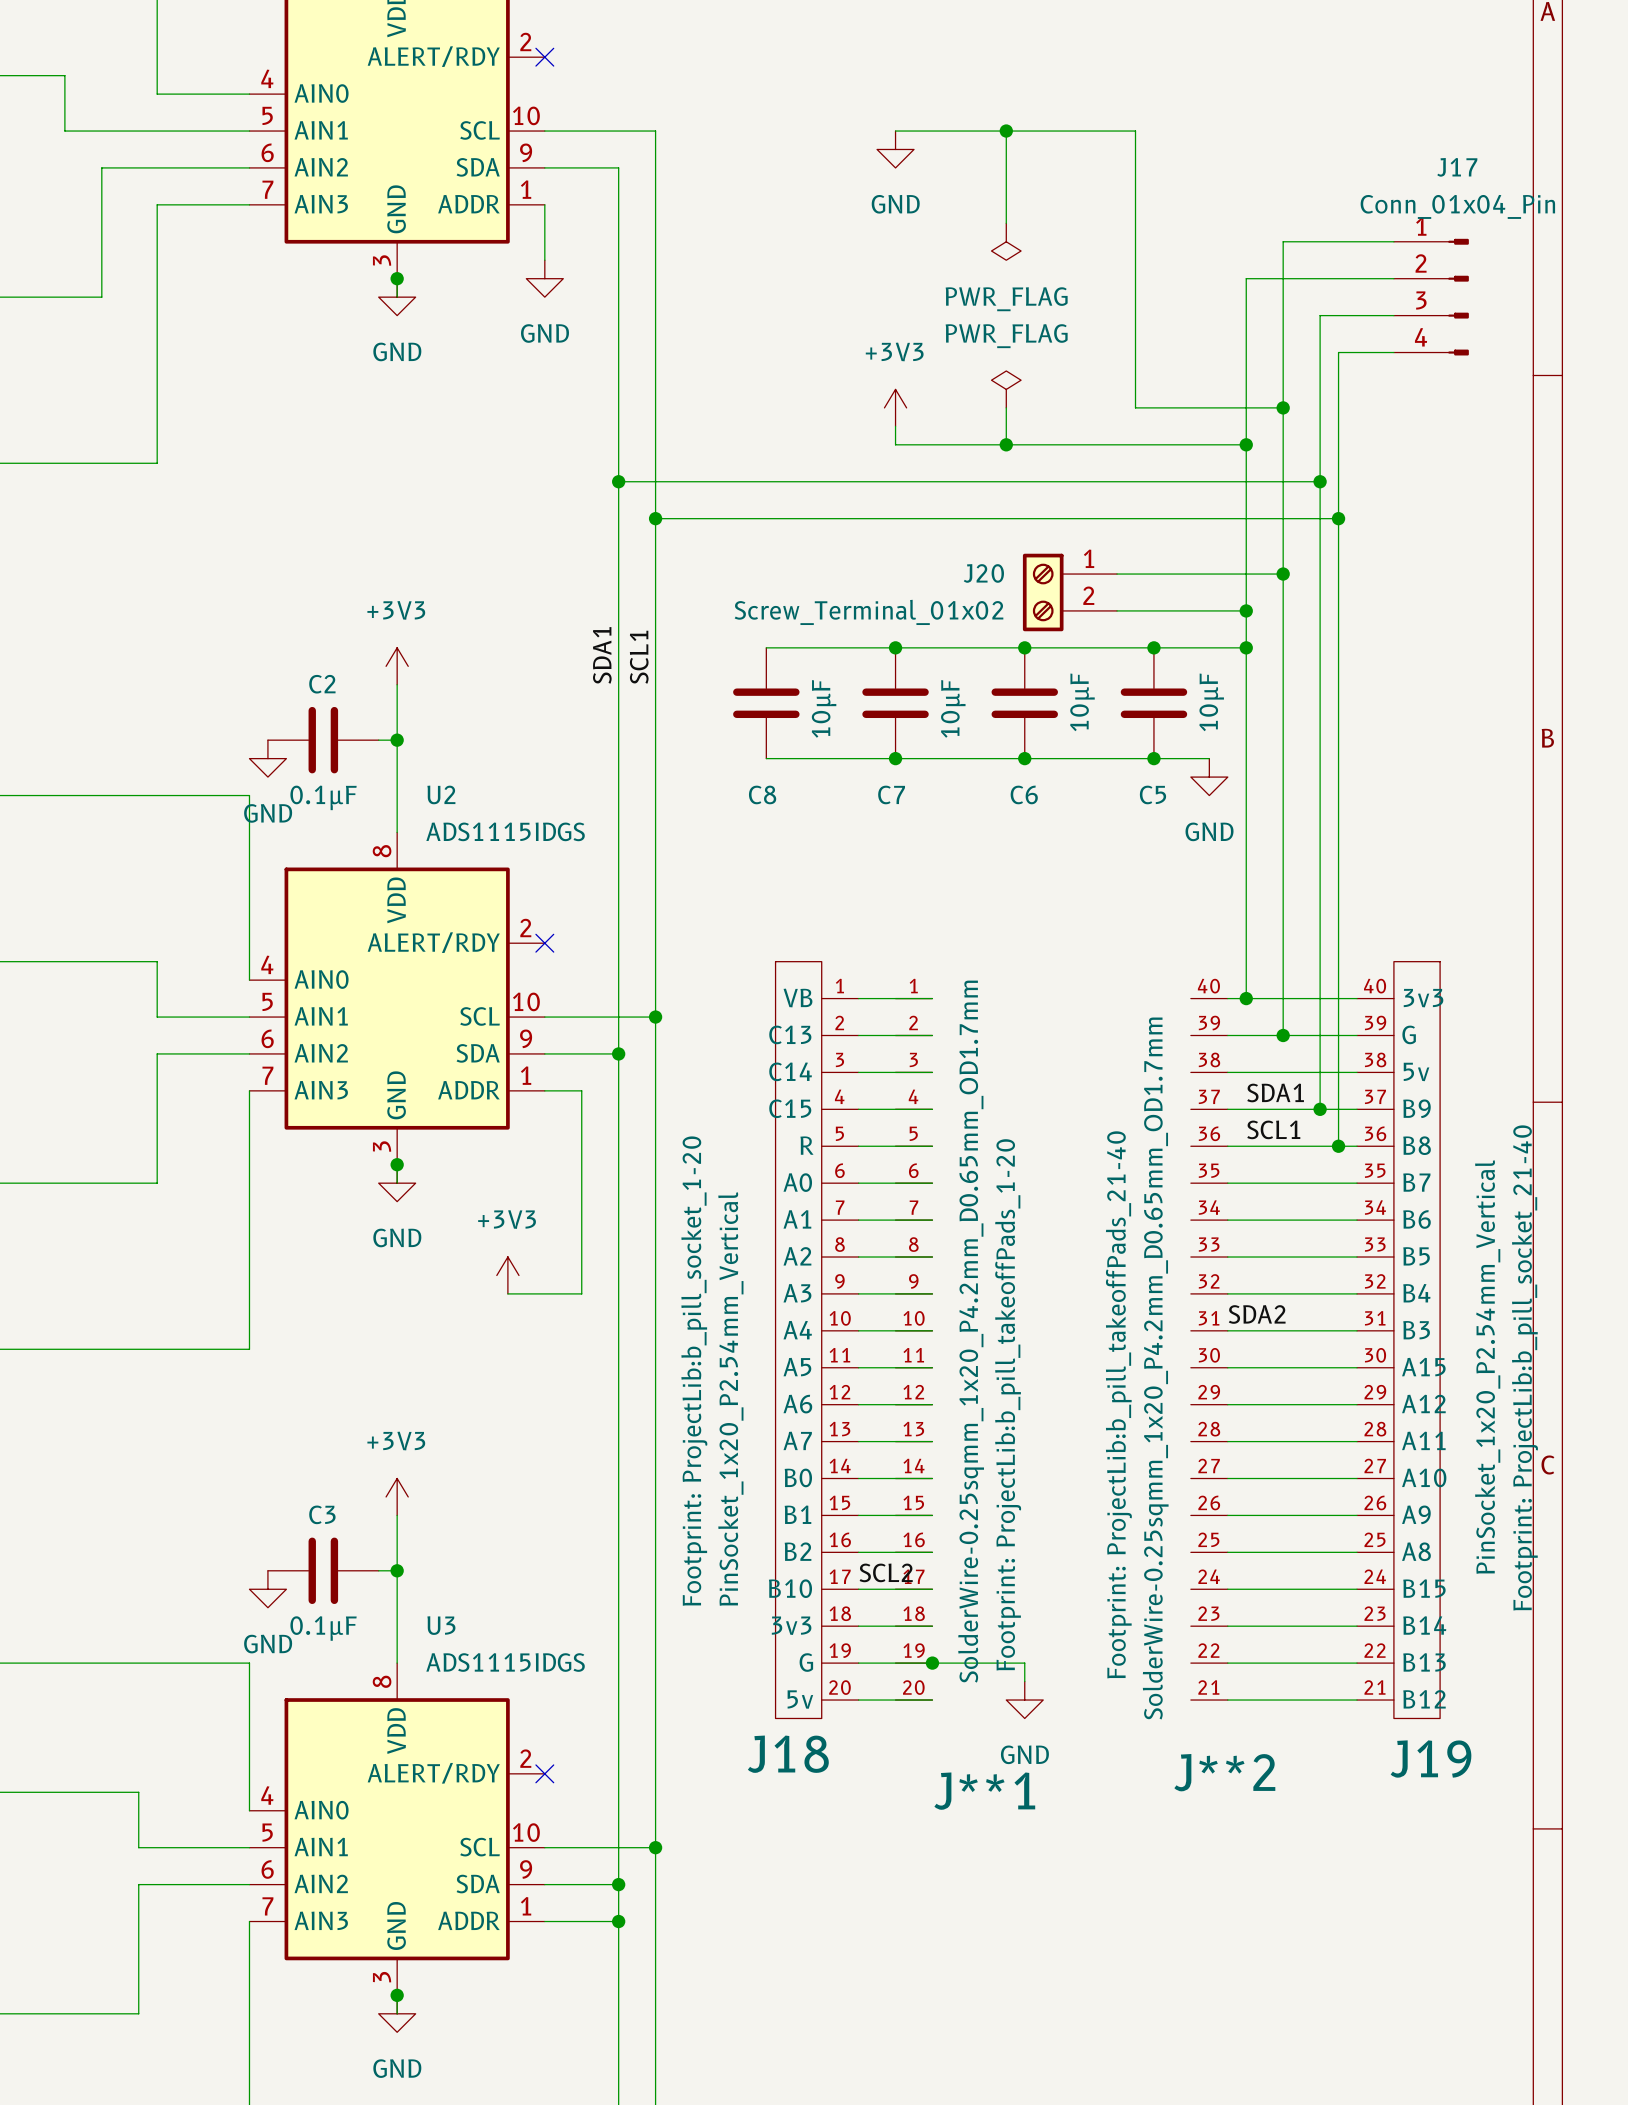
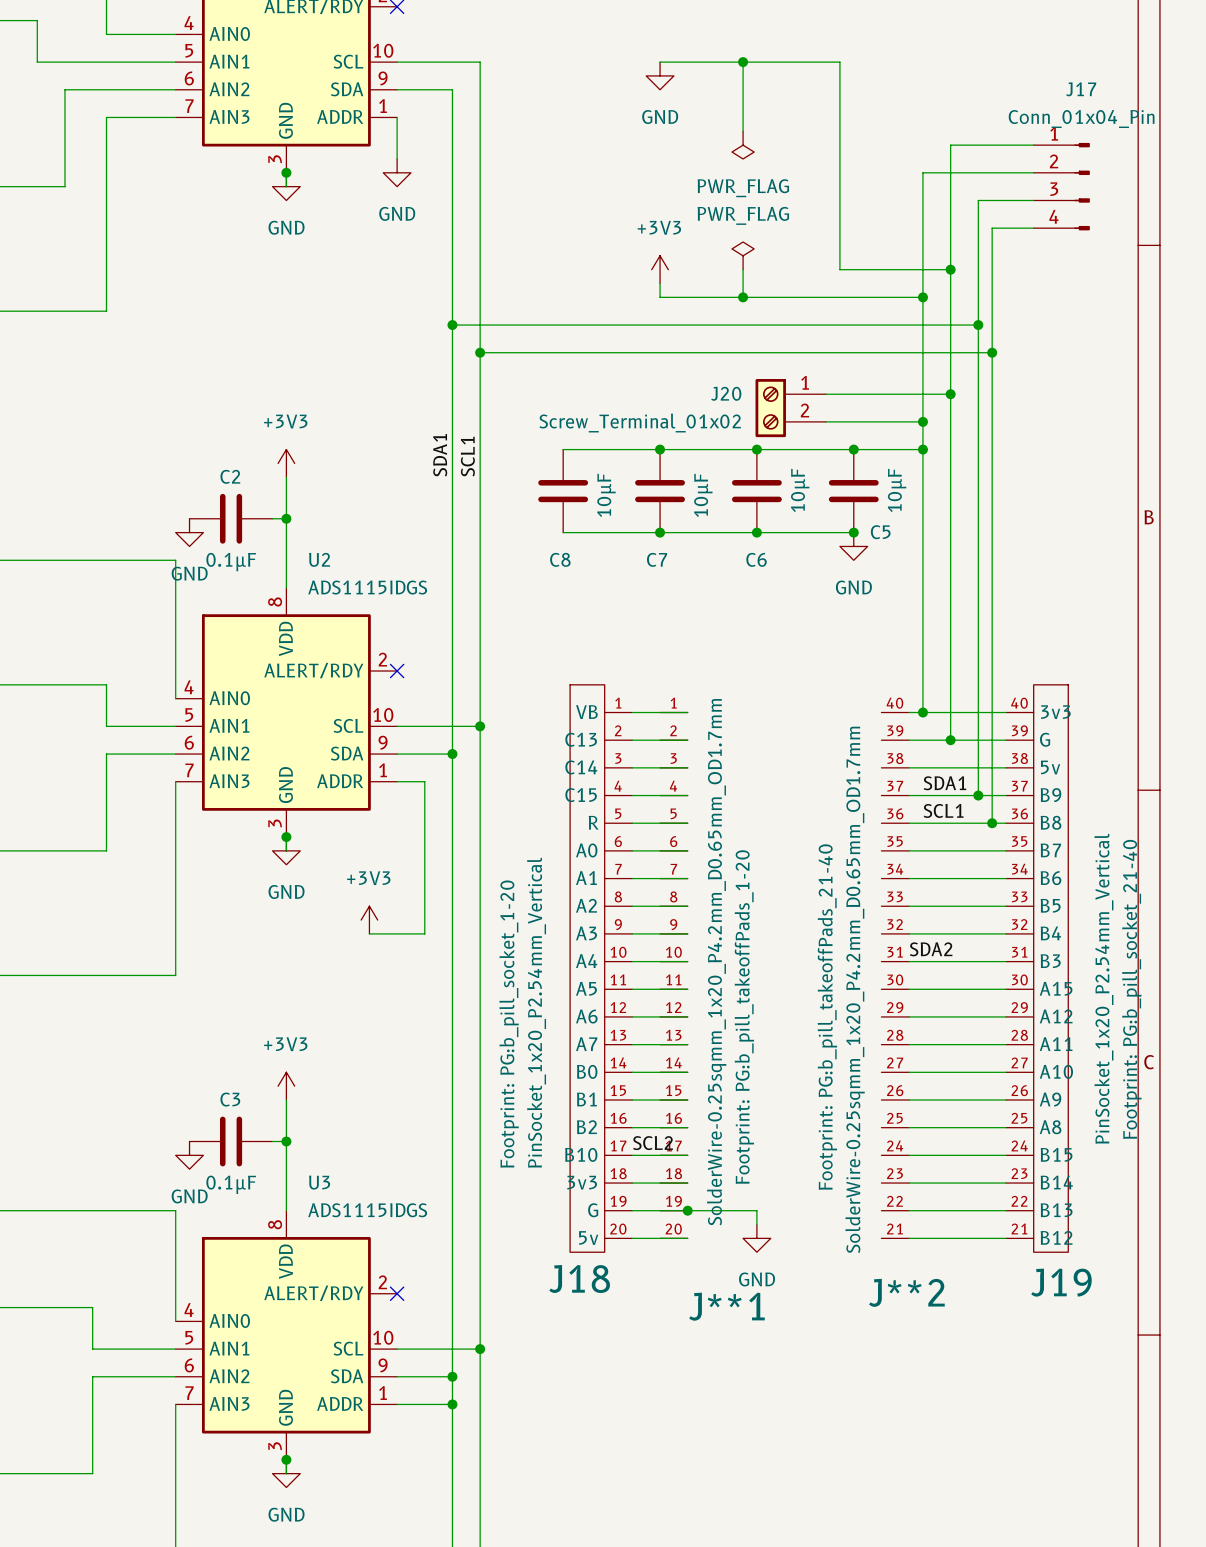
wire: (1153, 758) (1209, 758) -> none
power symbol position: GND (1209, 777) -> GND (853, 546)
C5 name position: C5 (1152, 794) -> C5 (880, 532)
J19 text: Footprint: ProjectLib:b_pill_socket_21-40 (1524, 1367) -> Footprint: PG:b_pill_socket_21-40 (1131, 989)
J18 text: Footprint: ProjectLib:b_pill_socket_1-20 (694, 1371) -> Footprint: PG:b_pill_socket_1-20 (509, 1024)
J**1 text: Footprint: ProjectLib:b_pill_takeoffPads_1-20 (1008, 1404) -> Footprint: PG:b_pill_takeoffPads_1-20 (744, 1017)
J**2 text: Footprint: ProjectLib:b_pill_takeoffPads_21-40 (1118, 1404) -> Footprint: PG:b_pill_takeoffPads_21-40 (827, 1017)

